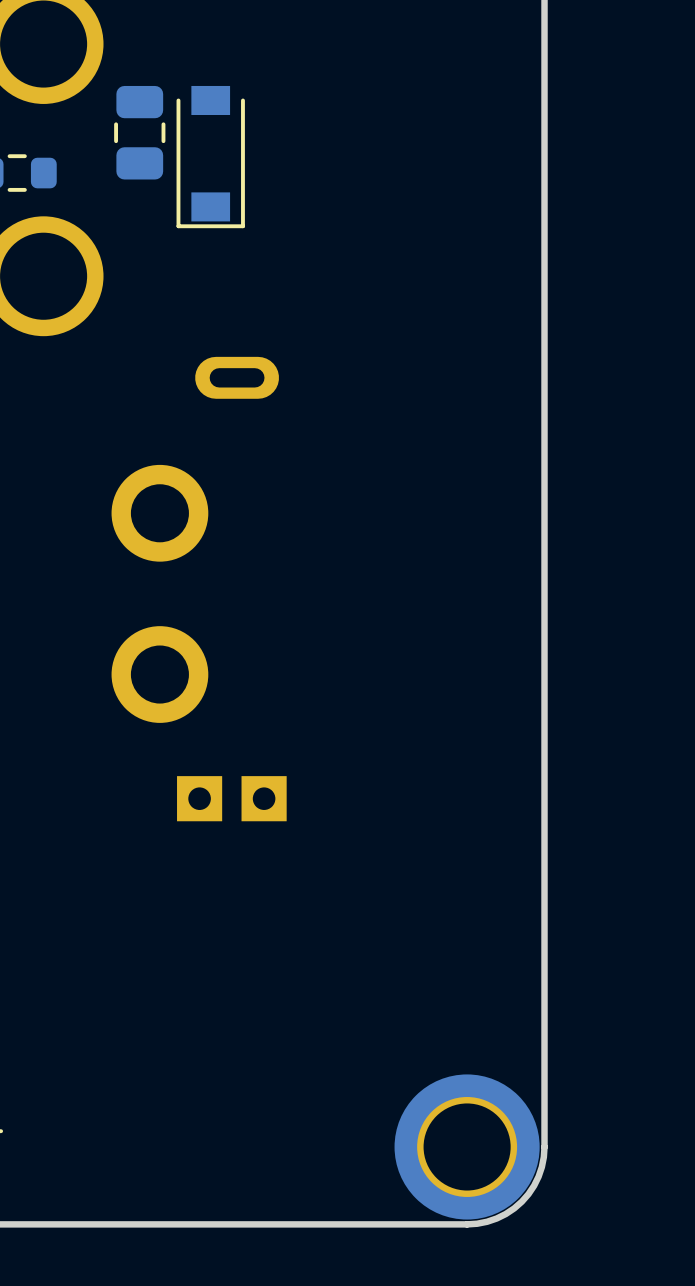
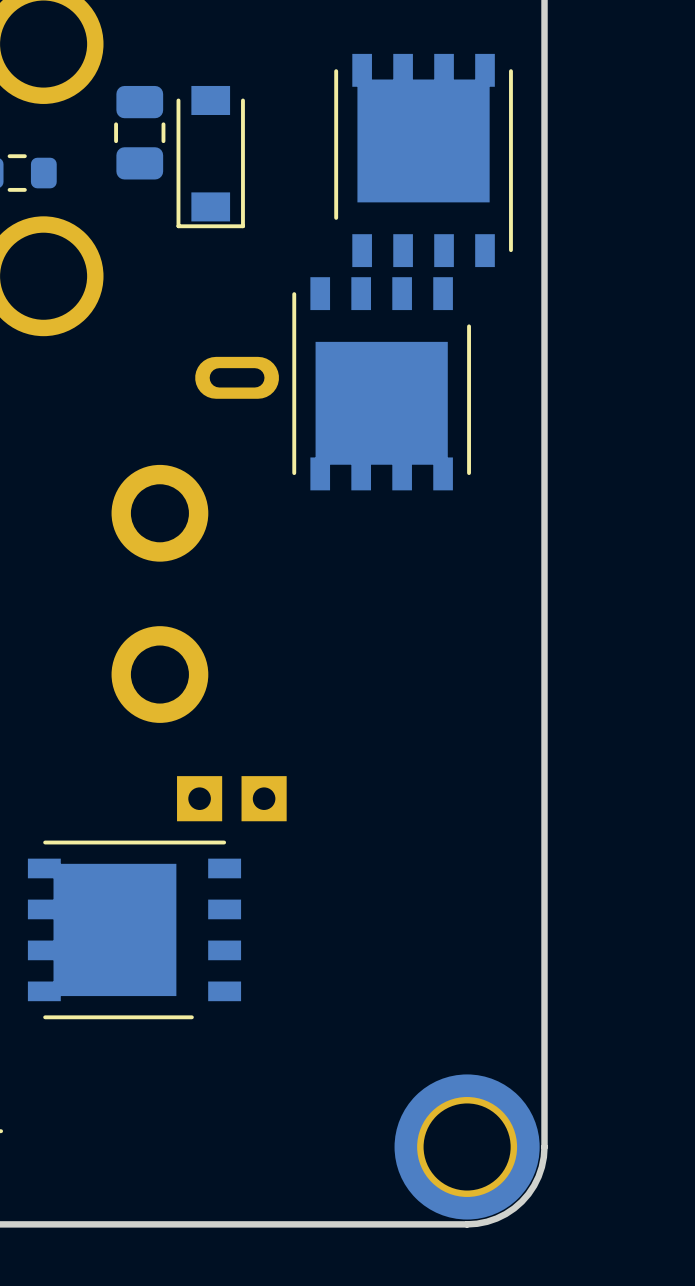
part: none -> (423, 160)
part: none -> (381, 383)
part: none -> (134, 929)

